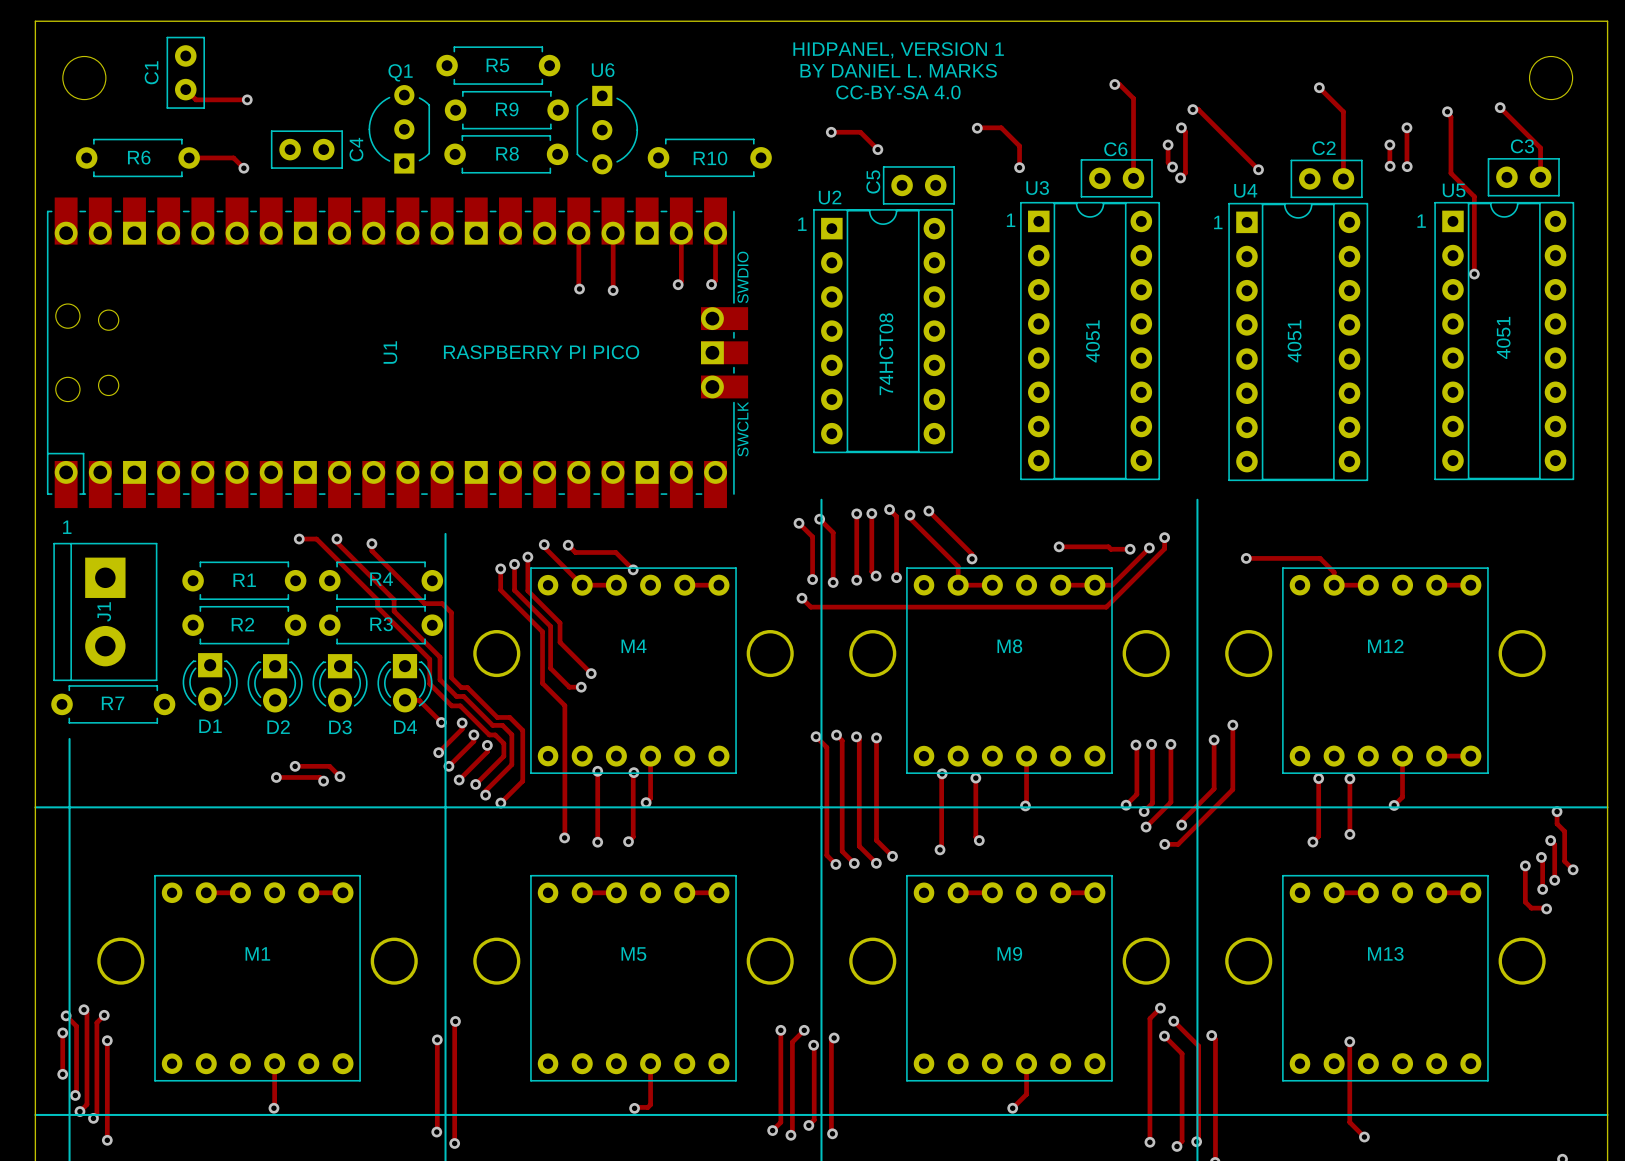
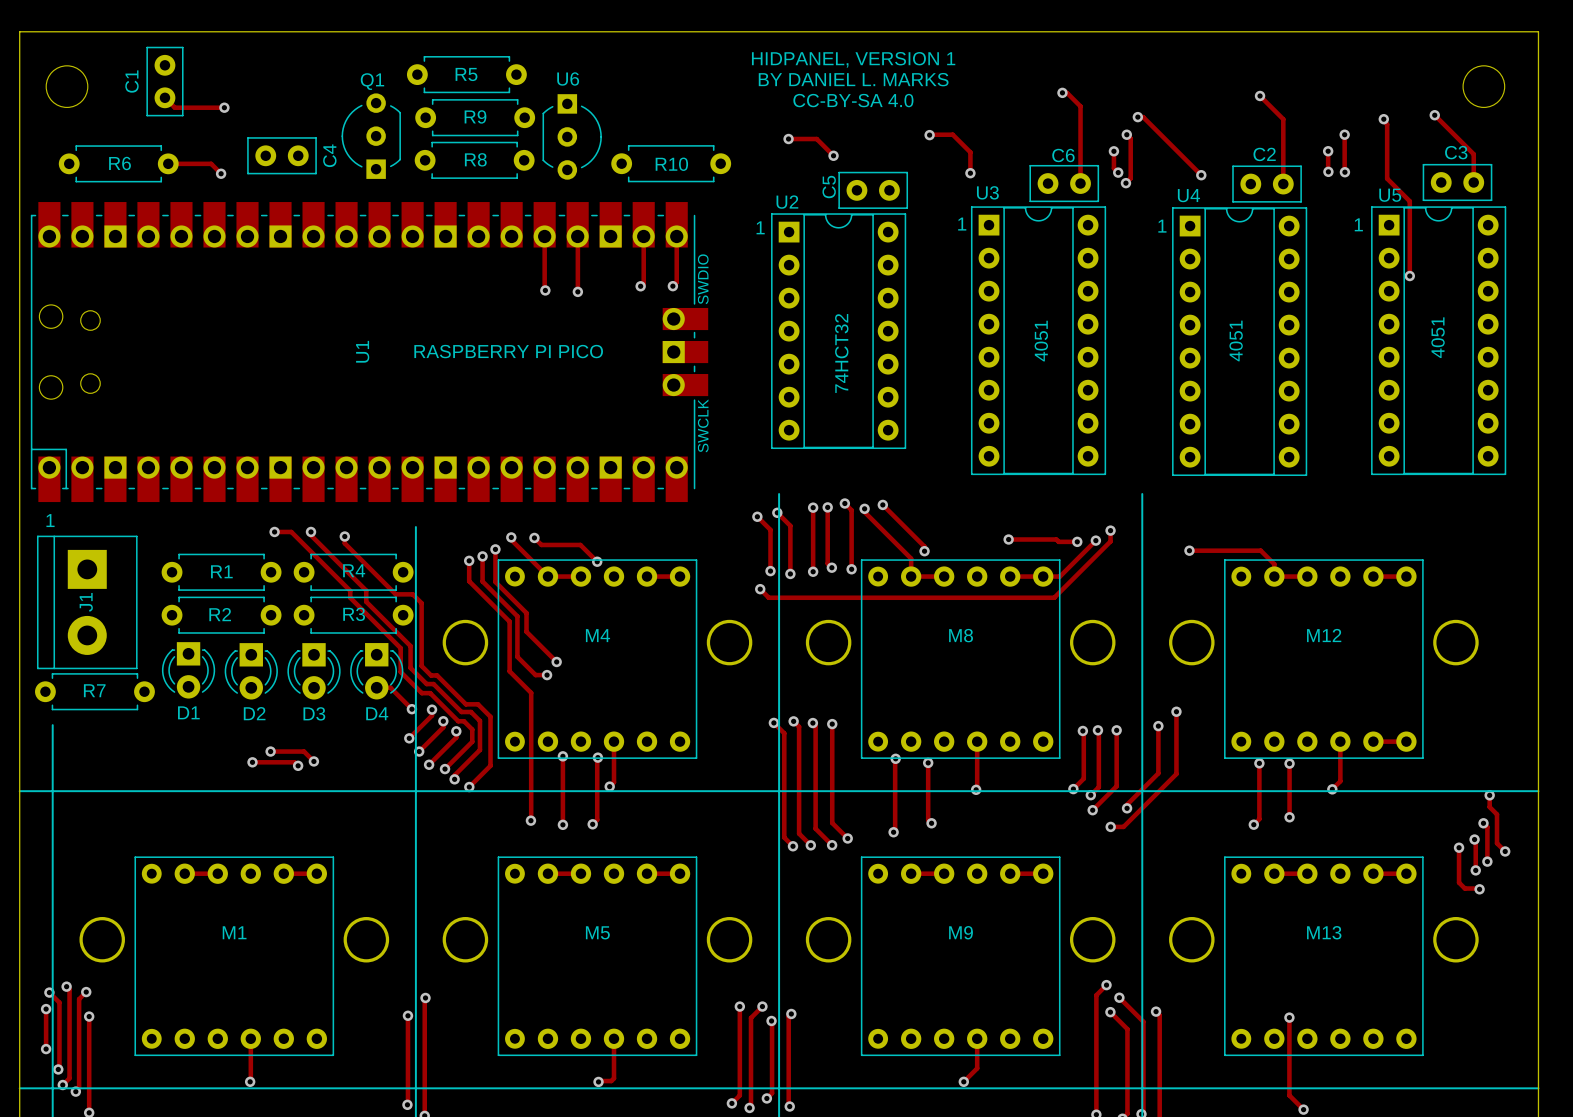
text: 74HCT08 (886, 354) -> 74HCT32 (841, 353)

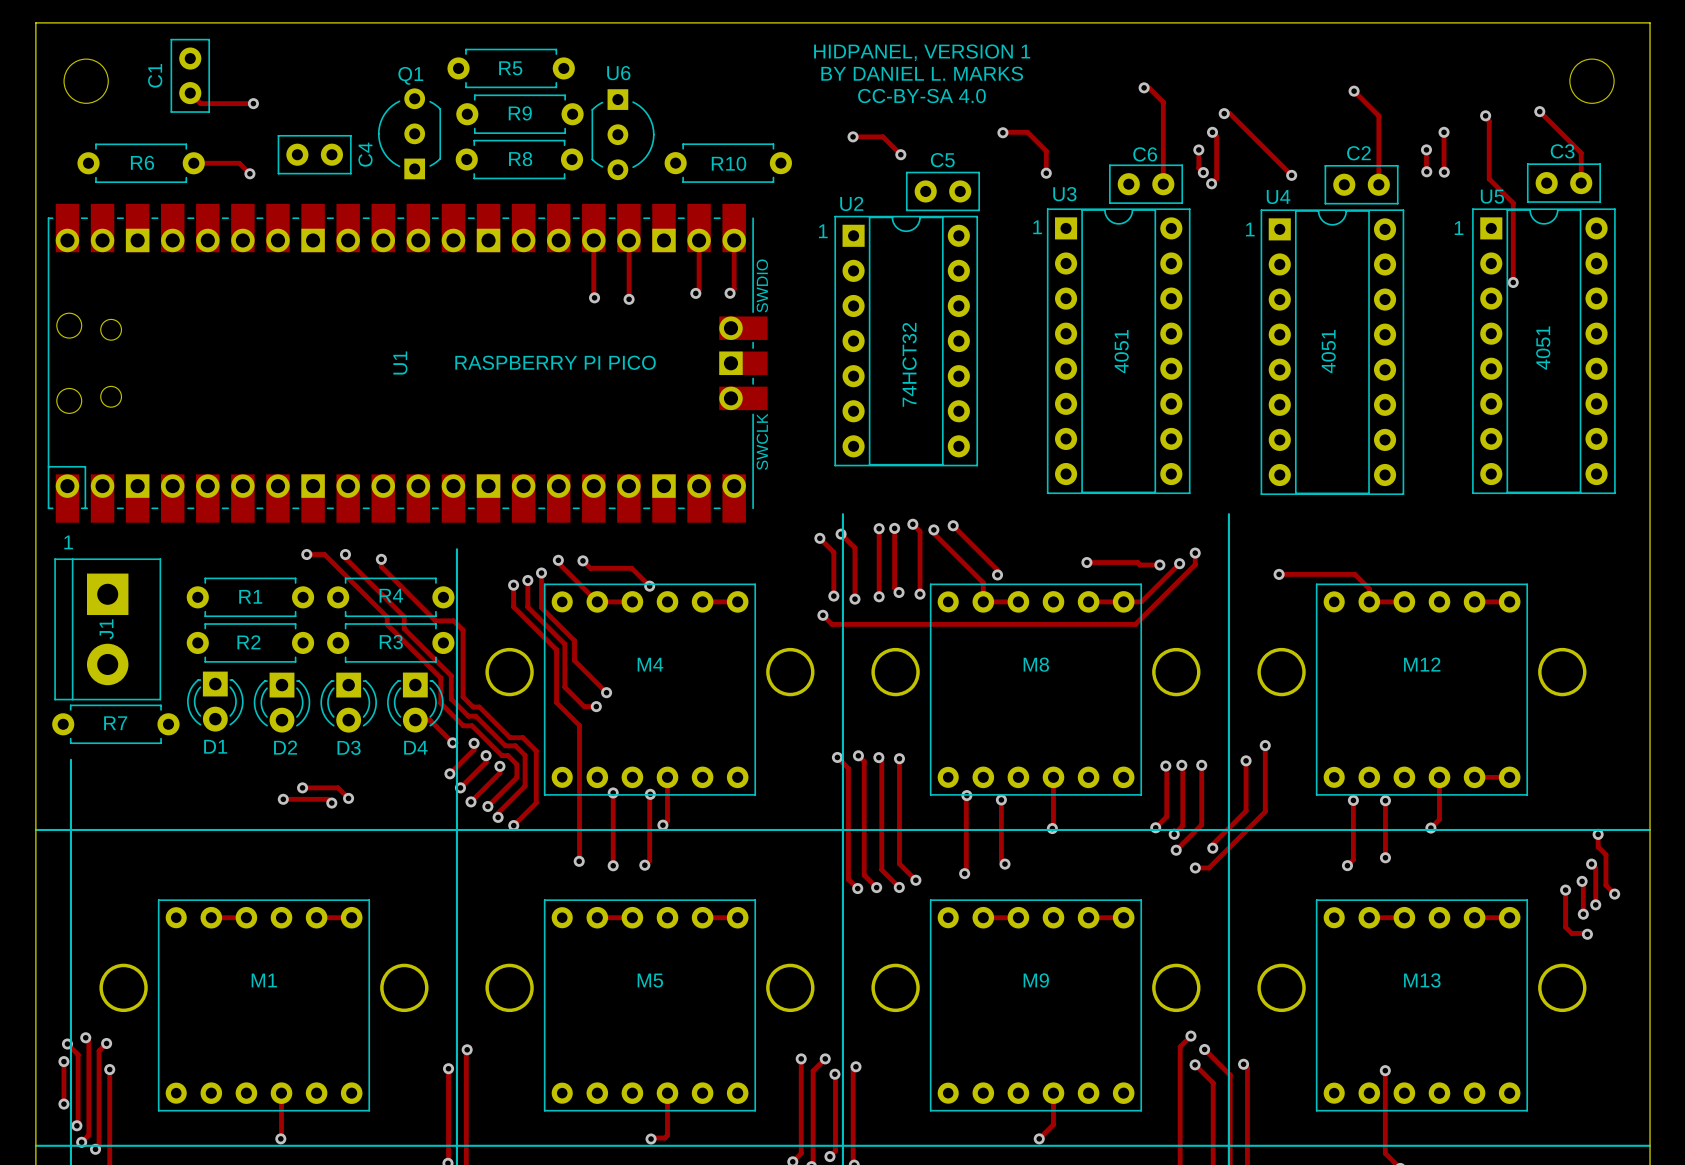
C5 name rotation: 0° (829, 187) -> 90° clockwise (942, 160)
C5 name position: C5 (829, 187) -> C5 (942, 160)

